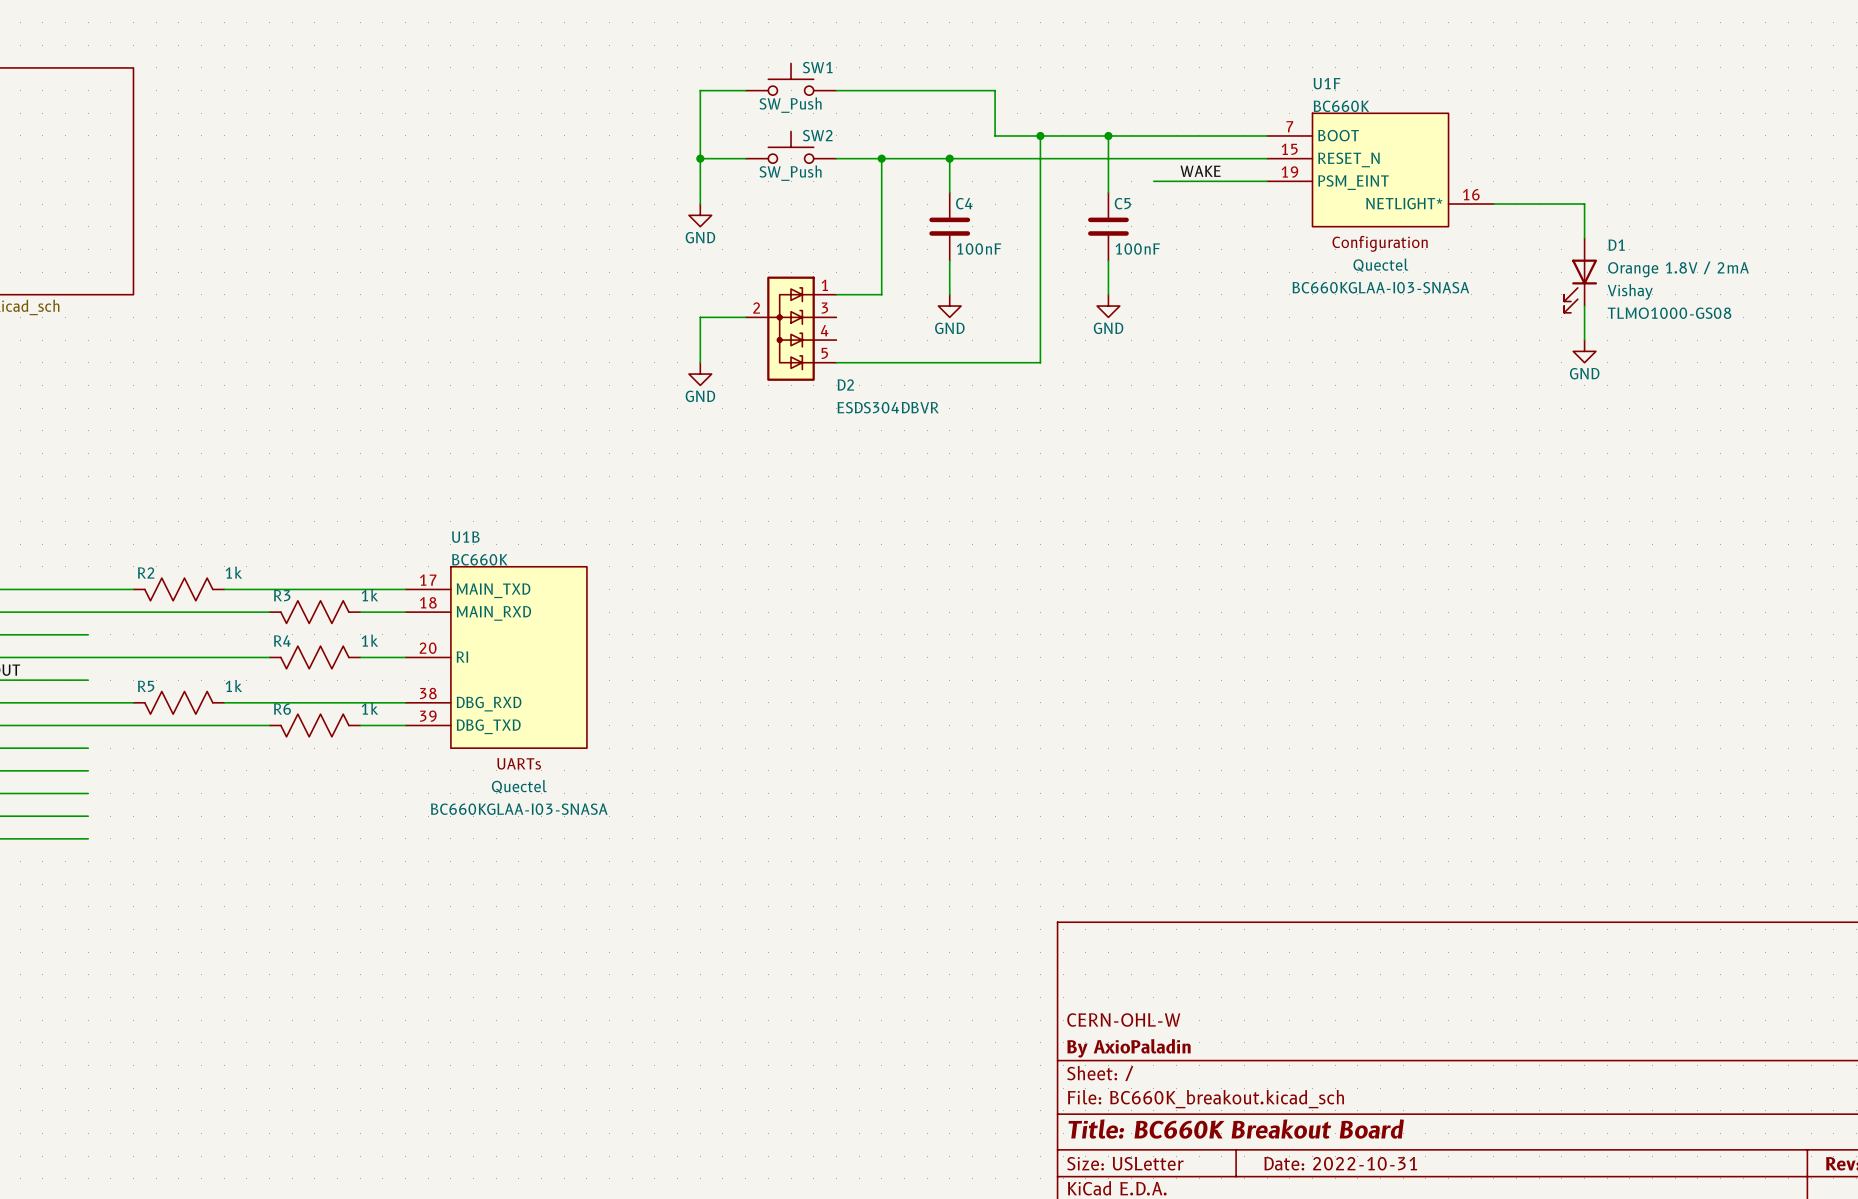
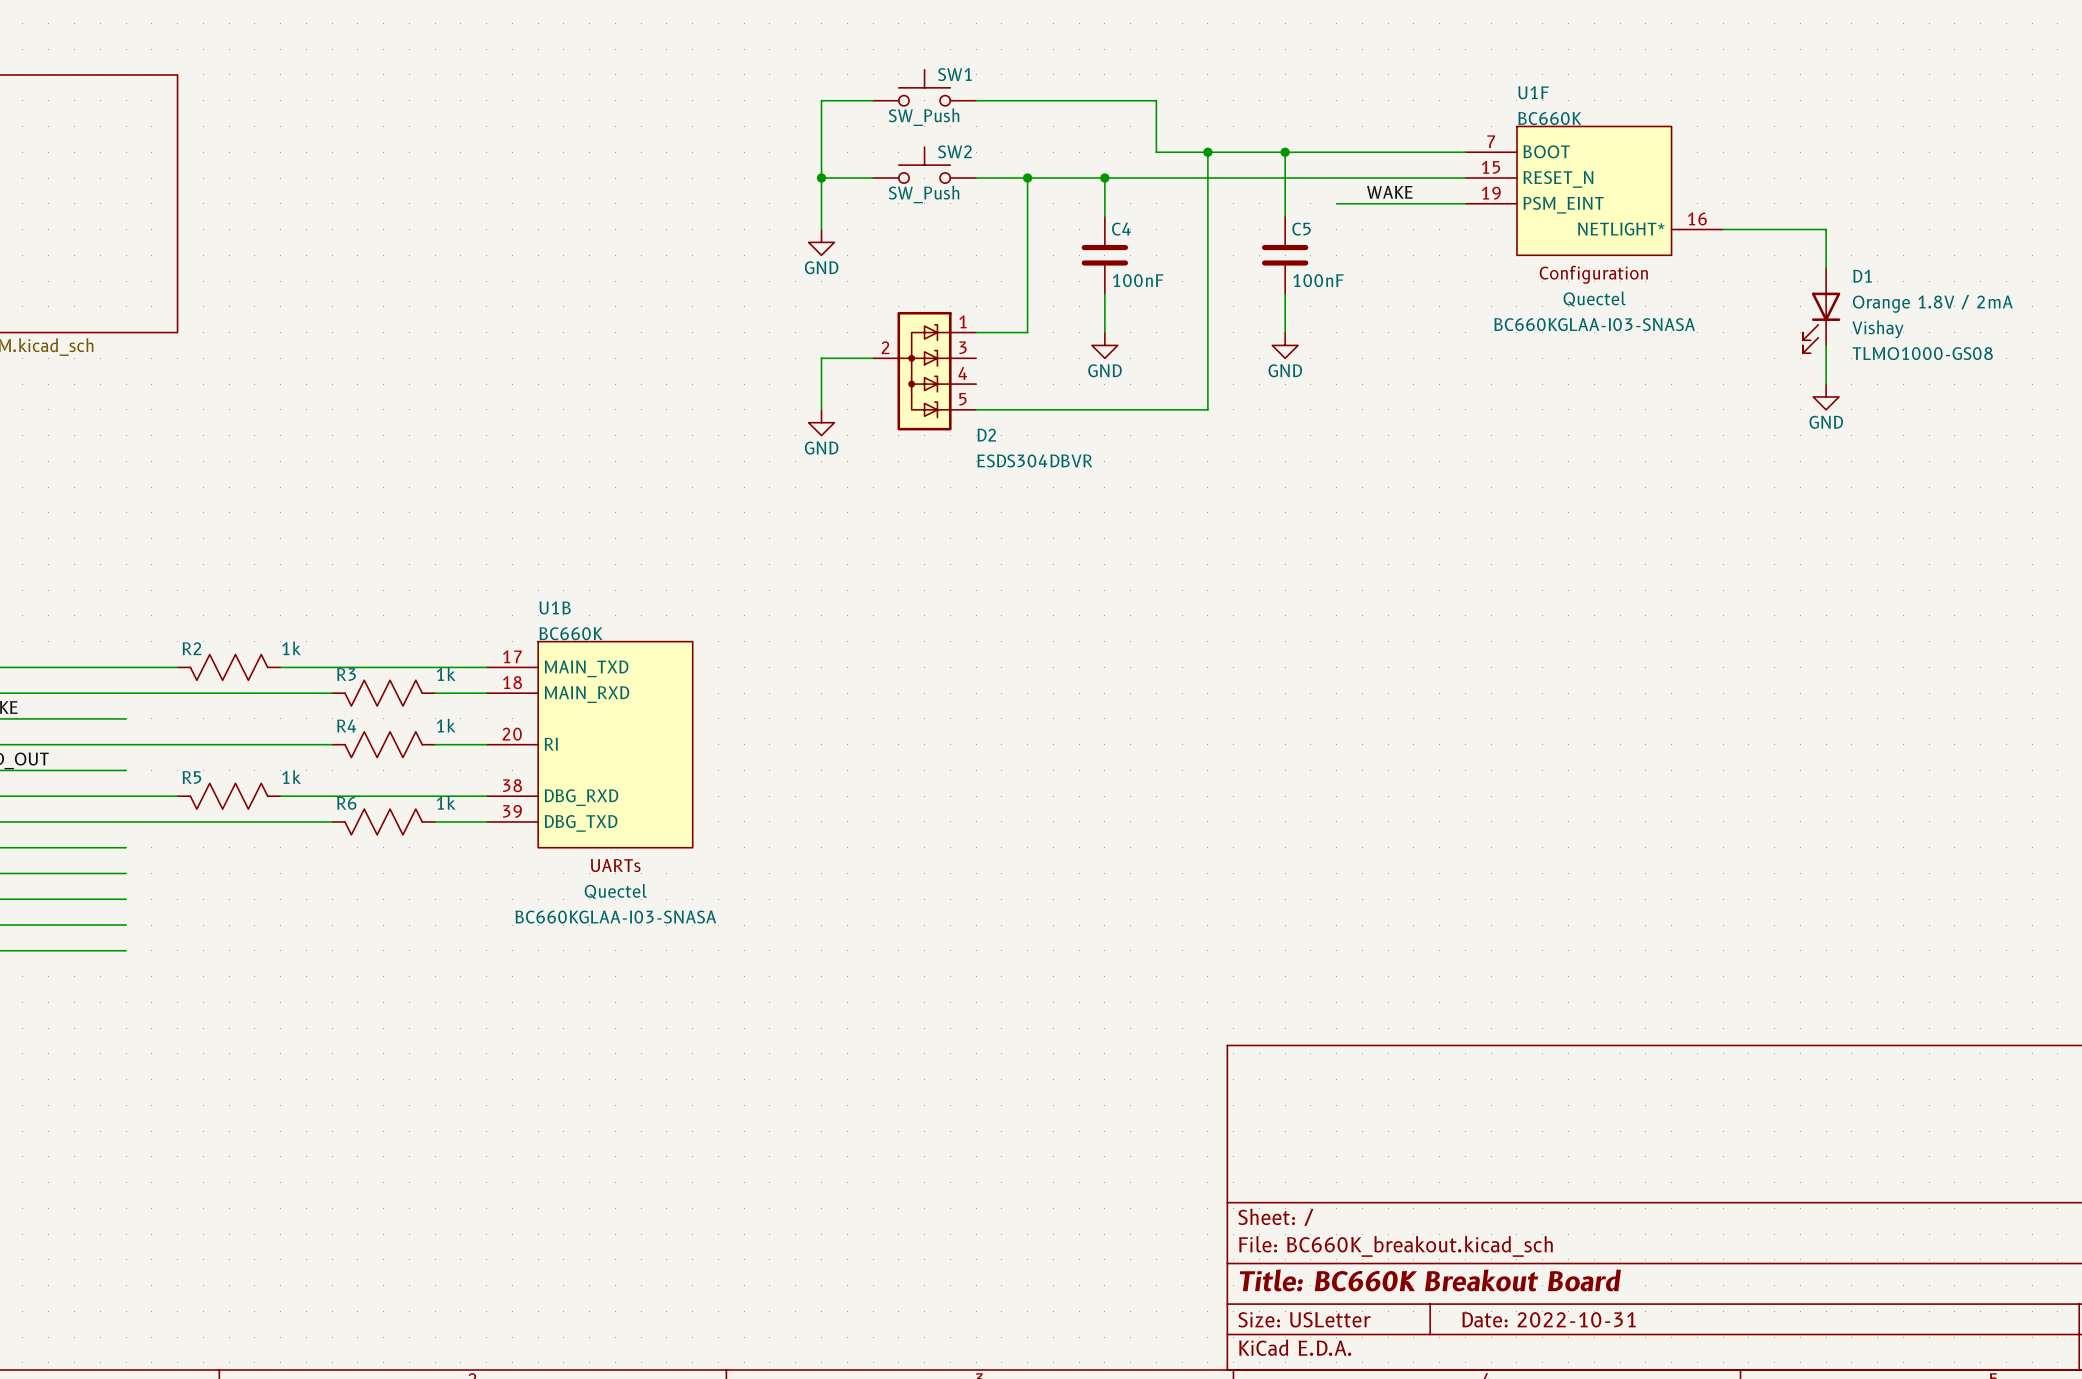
title block: CERN-OHL-W (1123, 1020) -> none
title block: By AxioPaladin (1128, 1048) -> none

